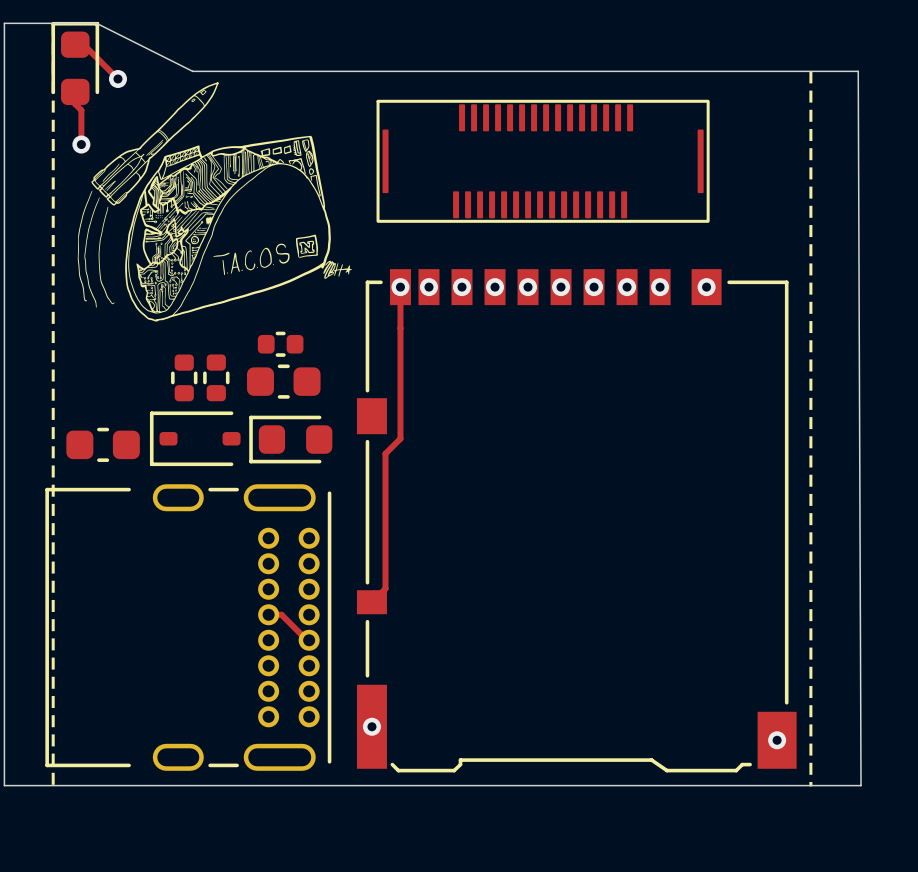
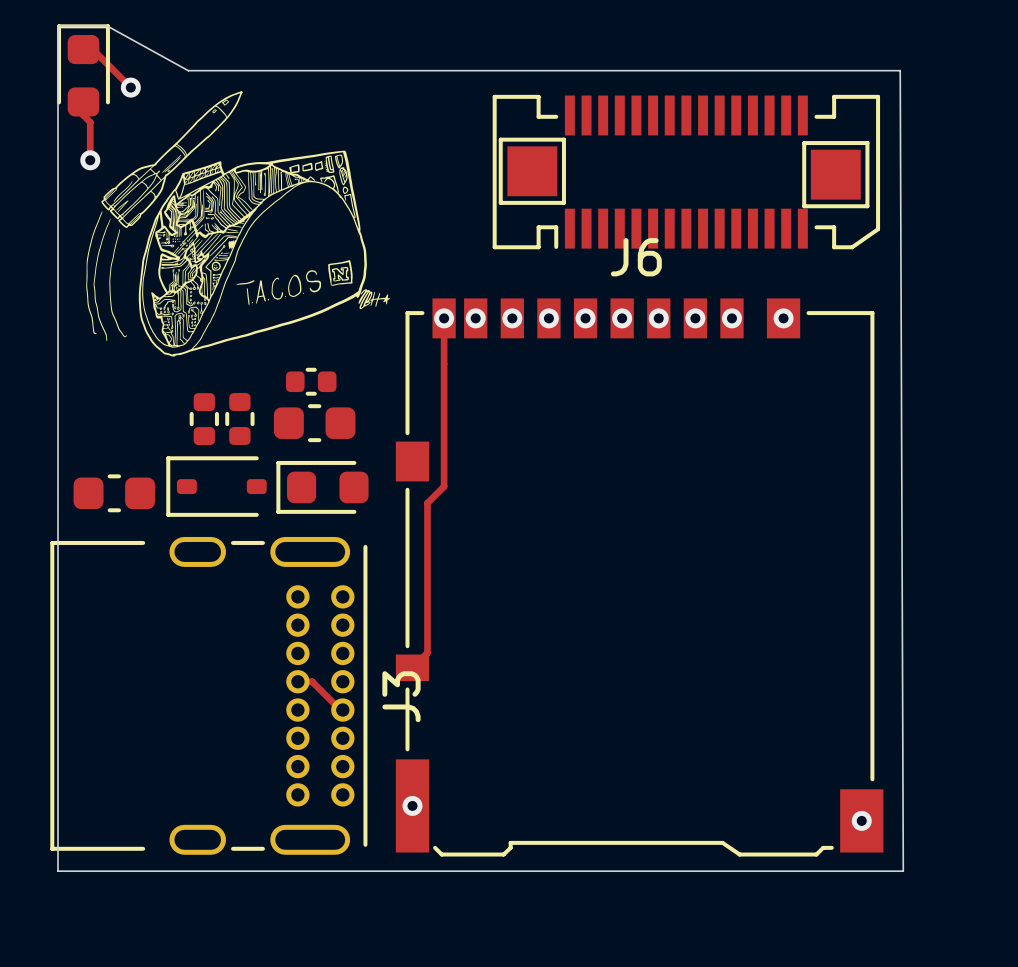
board edge: (52, 23) (4, 23) (4, 785) (52, 785) -> (58, 25) (58, 871)
line: (53, 23) (53, 786) -> none
board edge: (96, 23) (192, 71) (858, 71) (861, 785) (814, 785) -> (107, 25) (188, 70) (900, 70) (903, 871)
line: (810, 71) (810, 786) -> none
part: none -> (532, 171)
part: none -> (686, 172)
part: none -> (835, 174)
part: (543, 161) -> none
J6 name: none -> J6 (636, 257)
J3 name: none -> J3 (401, 696)

